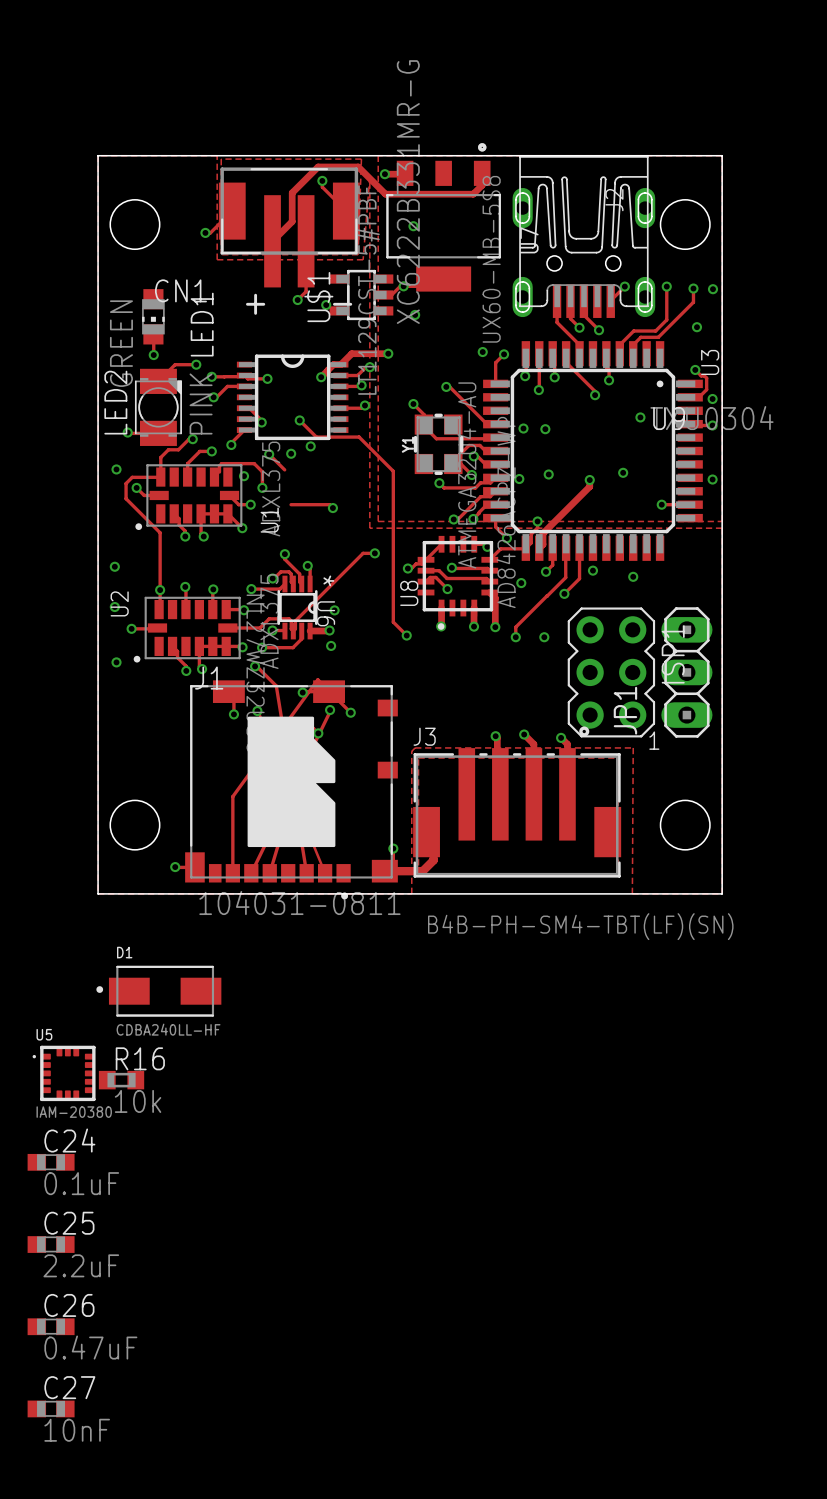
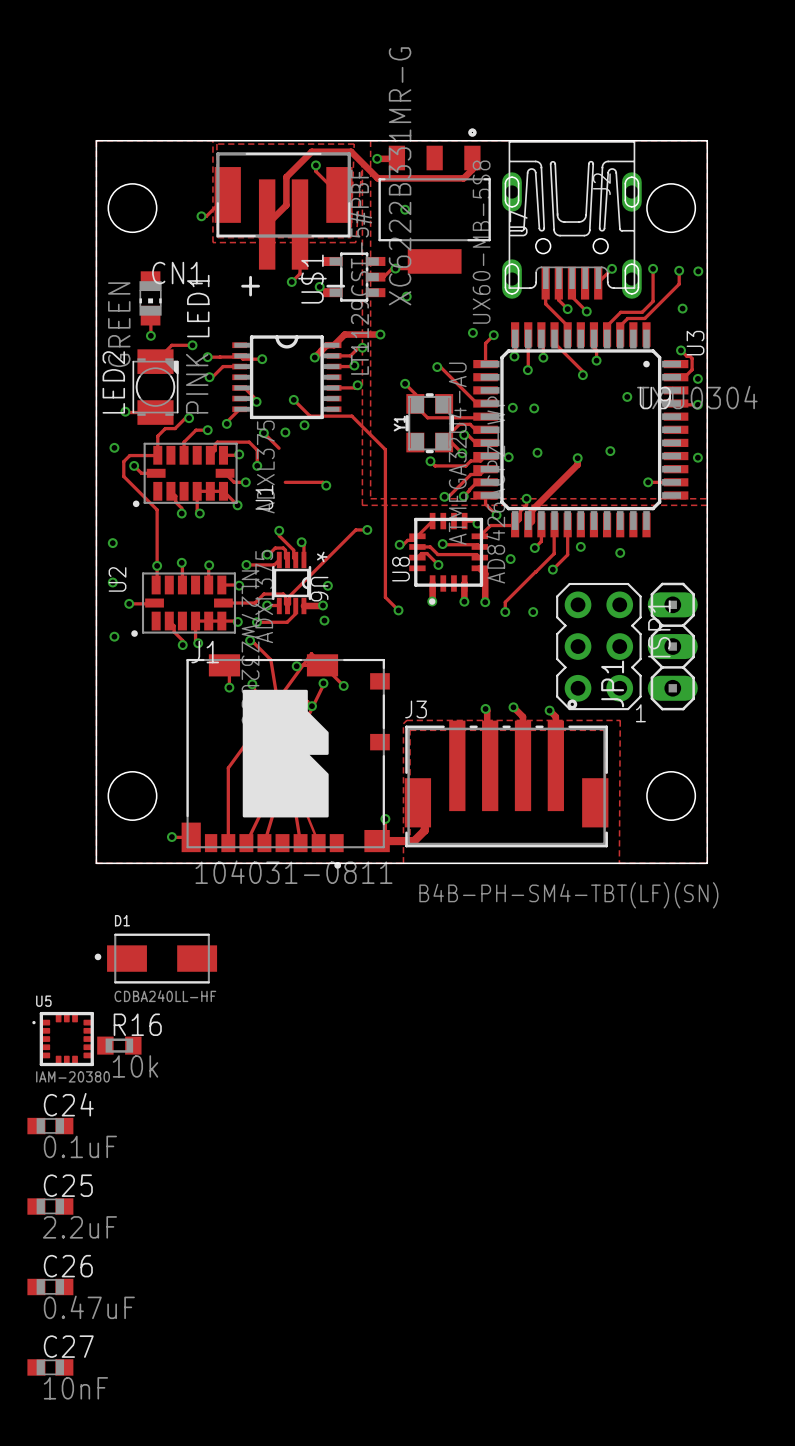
track: none -> (223, 455) (238, 455)

